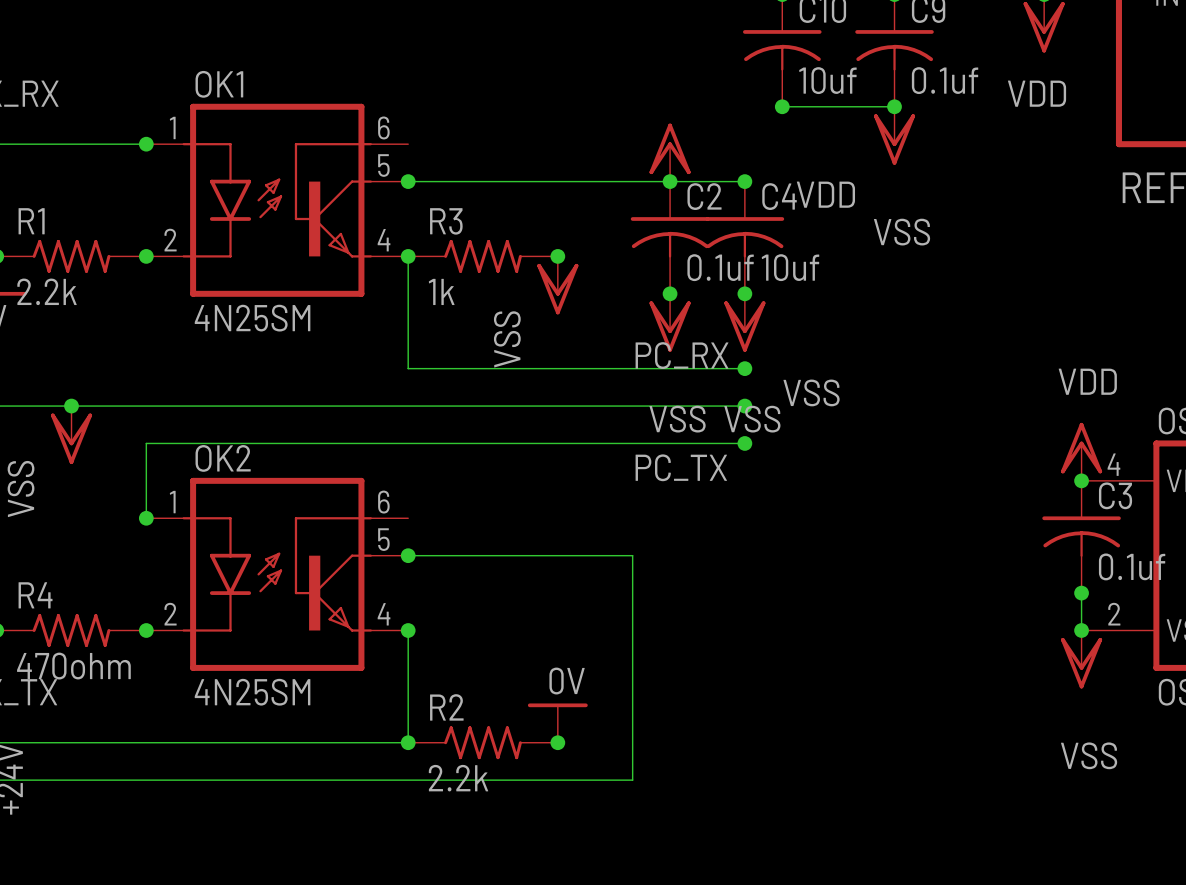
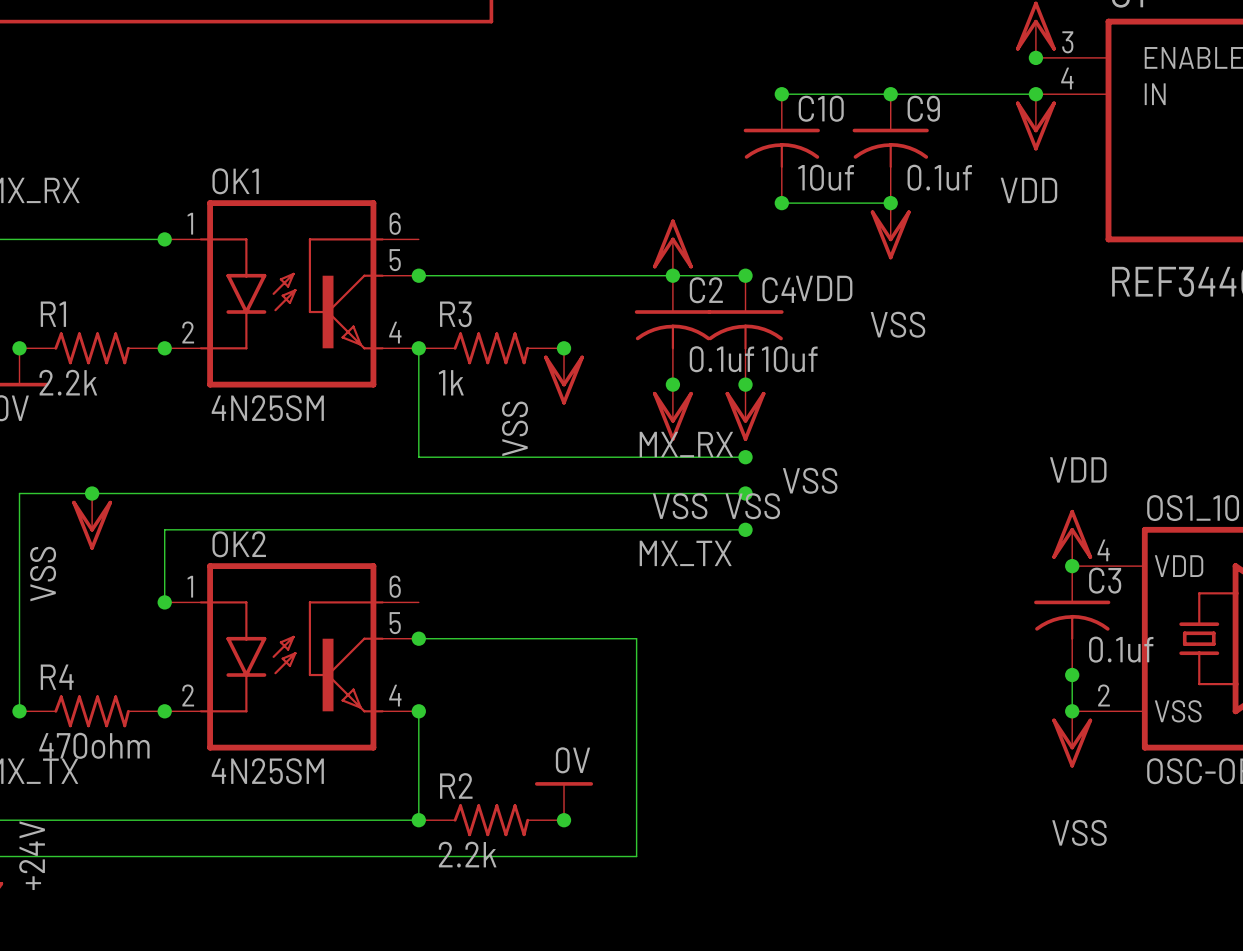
label: PC_RX (682, 355) -> MX_RX (686, 444)
label: PC_TX (681, 467) -> MX_TX (685, 553)

